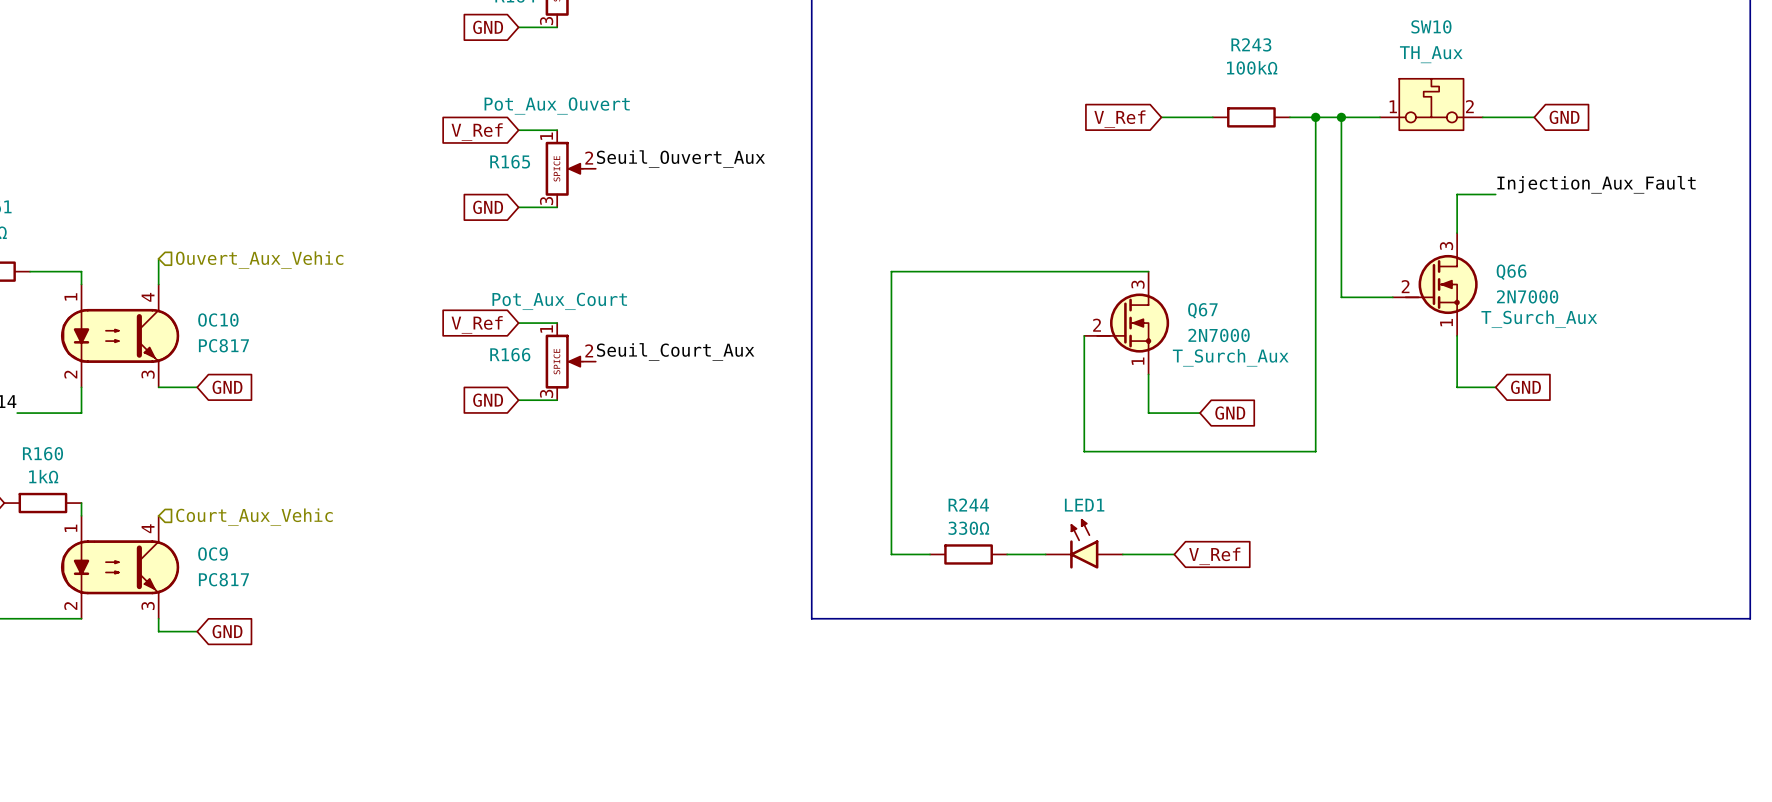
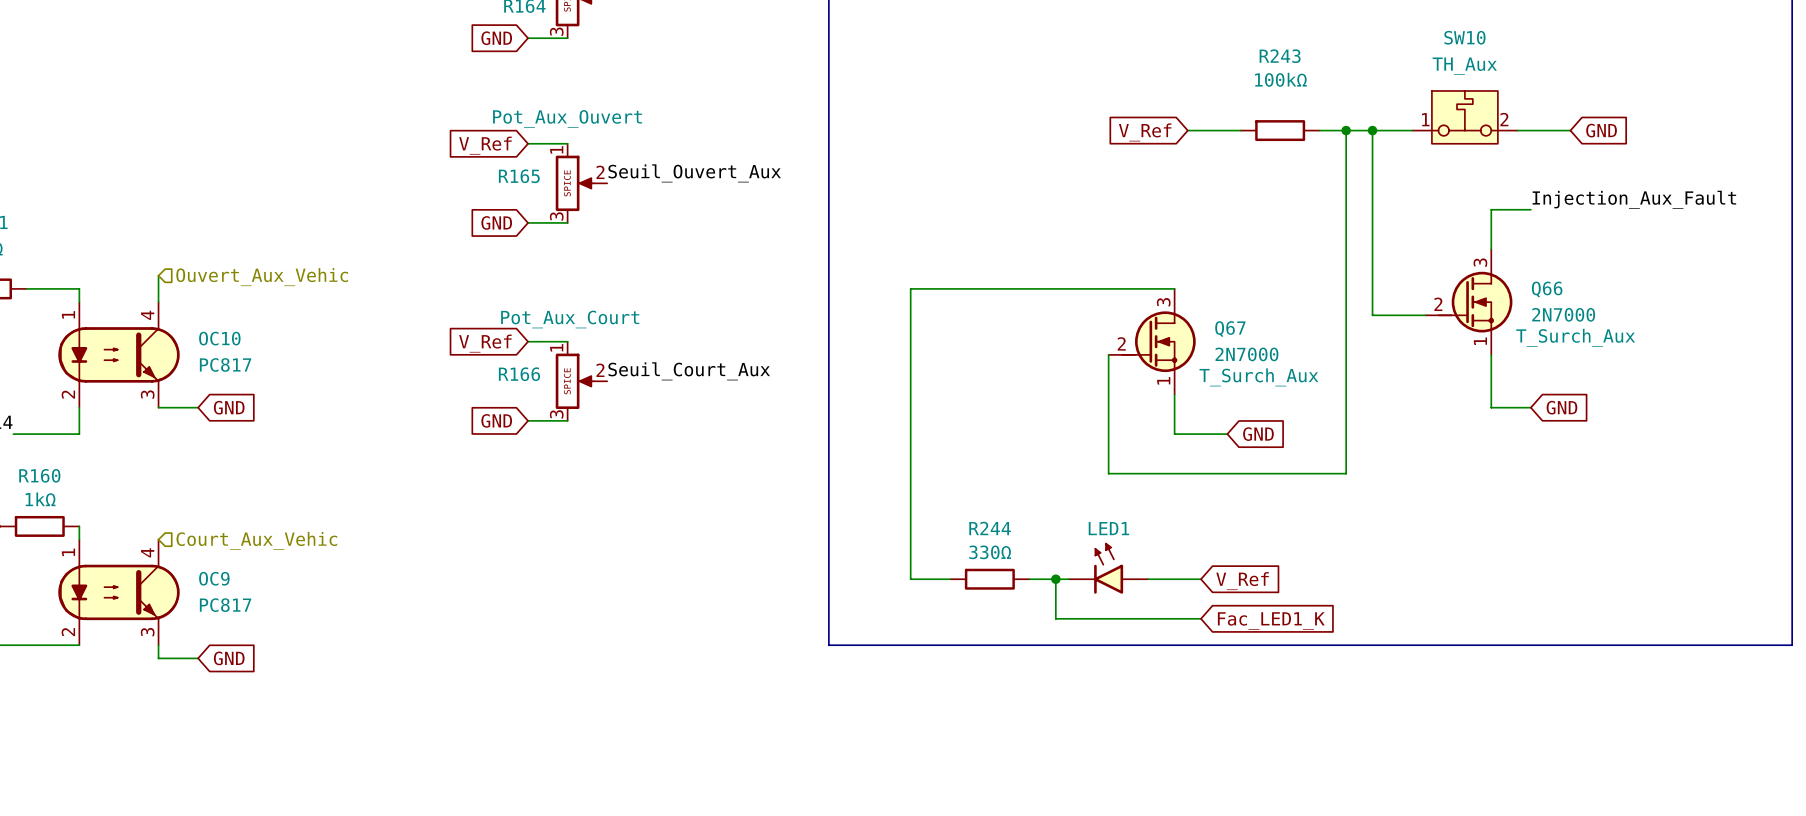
wire: none -> (1055, 579) (1055, 618) (1200, 618)
junction: none -> (1055, 579)
global label: none -> Fac_LED1_K (1271, 620)

